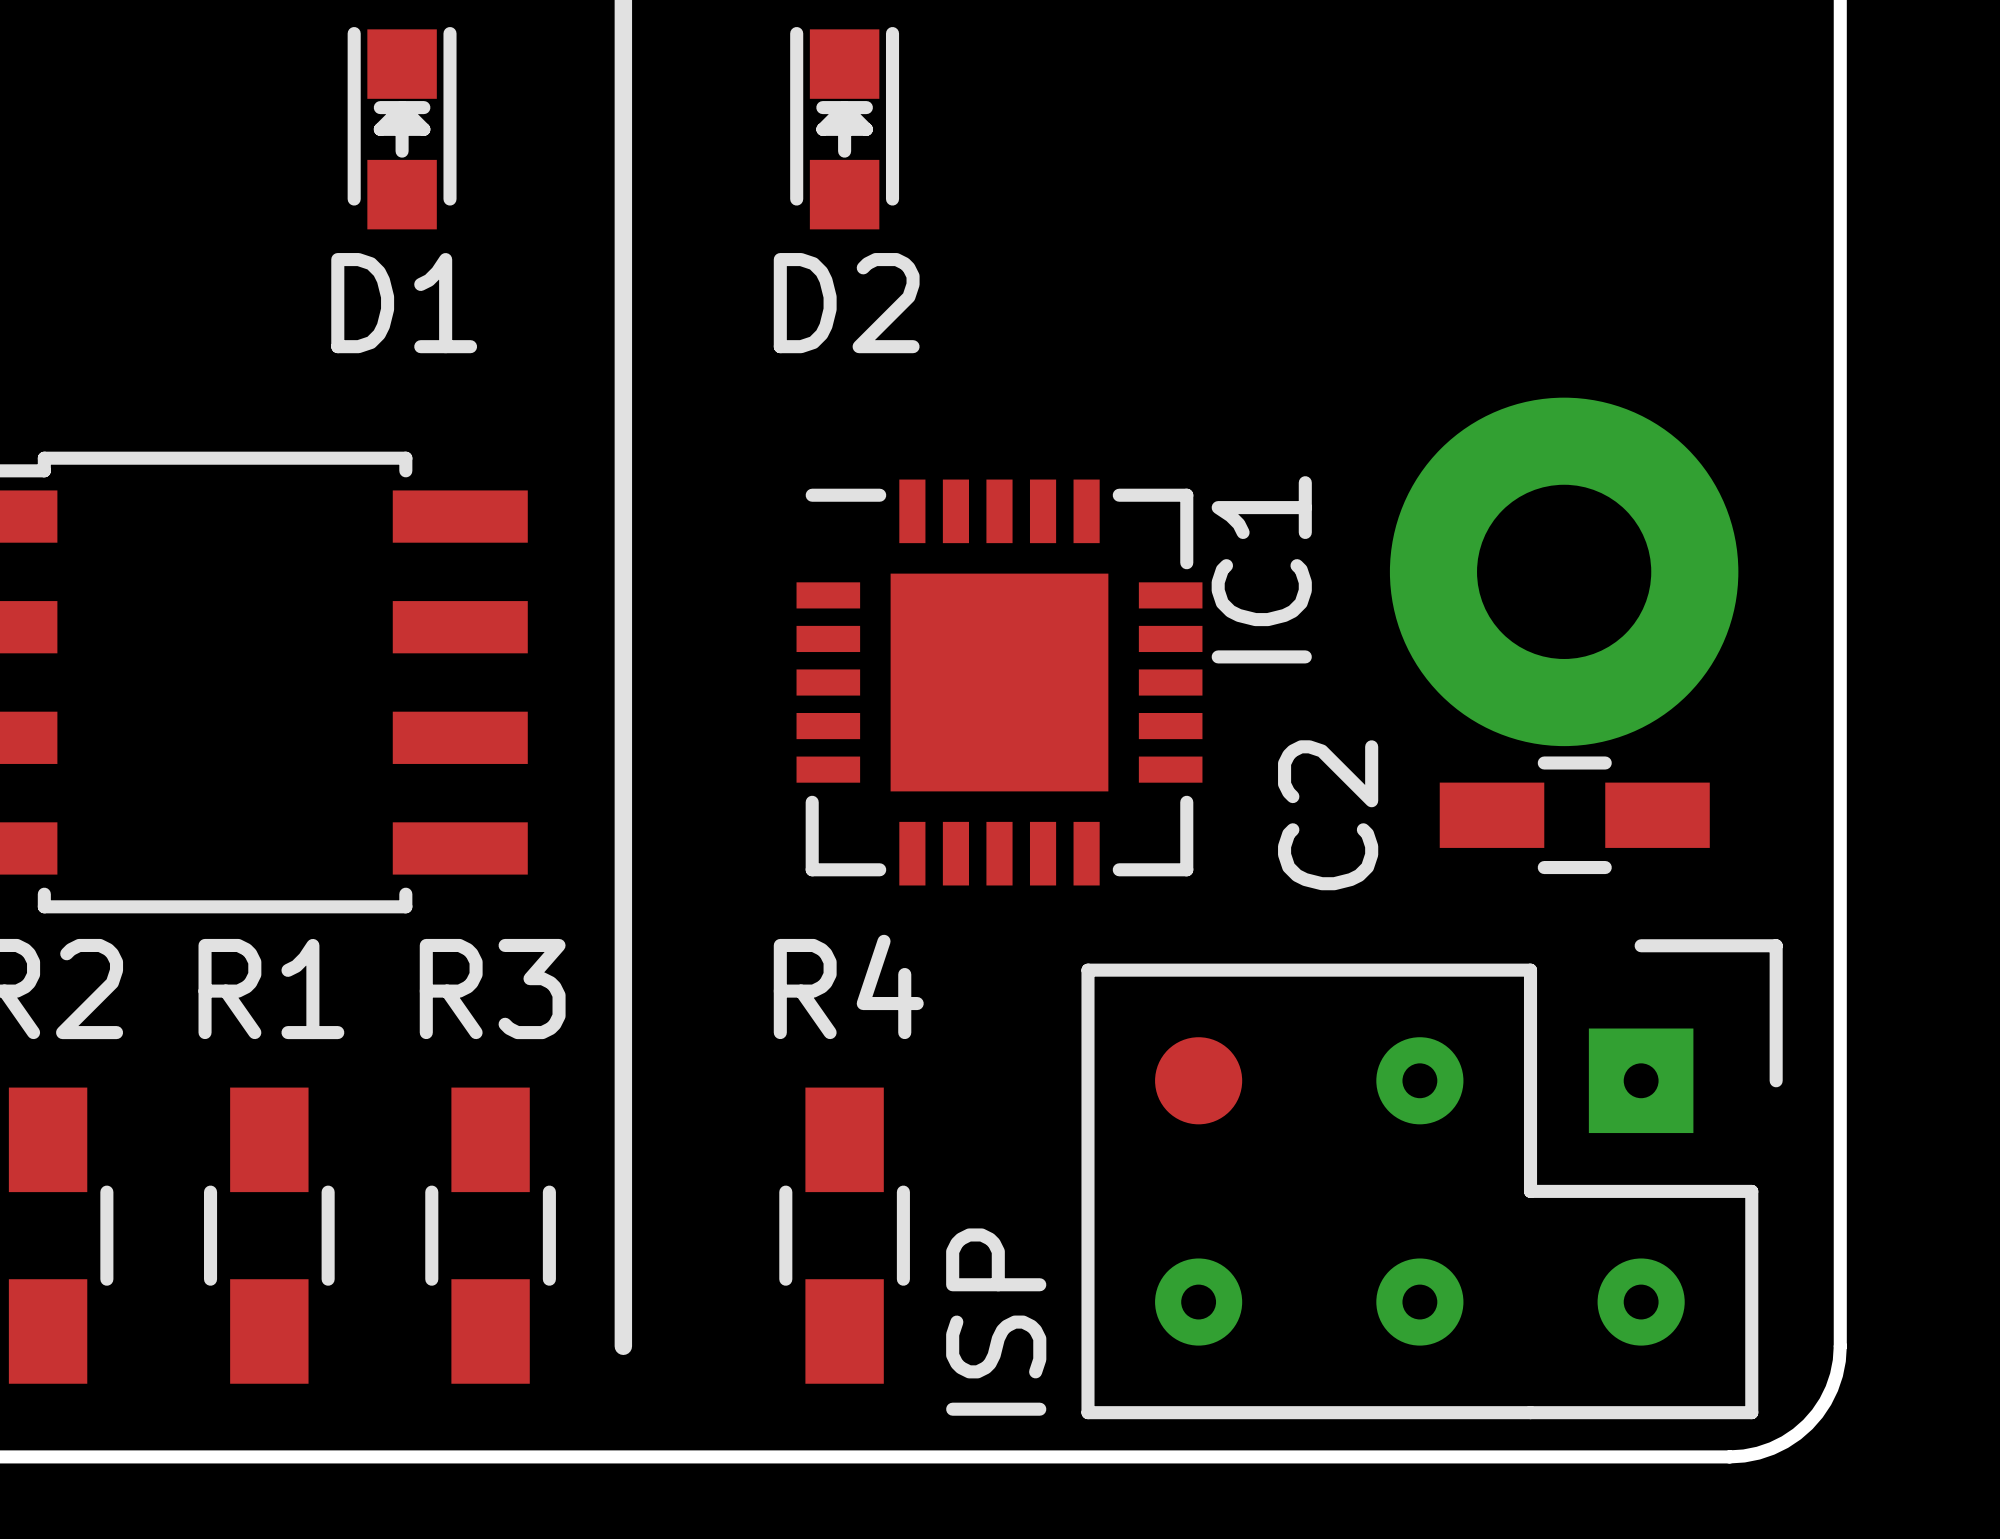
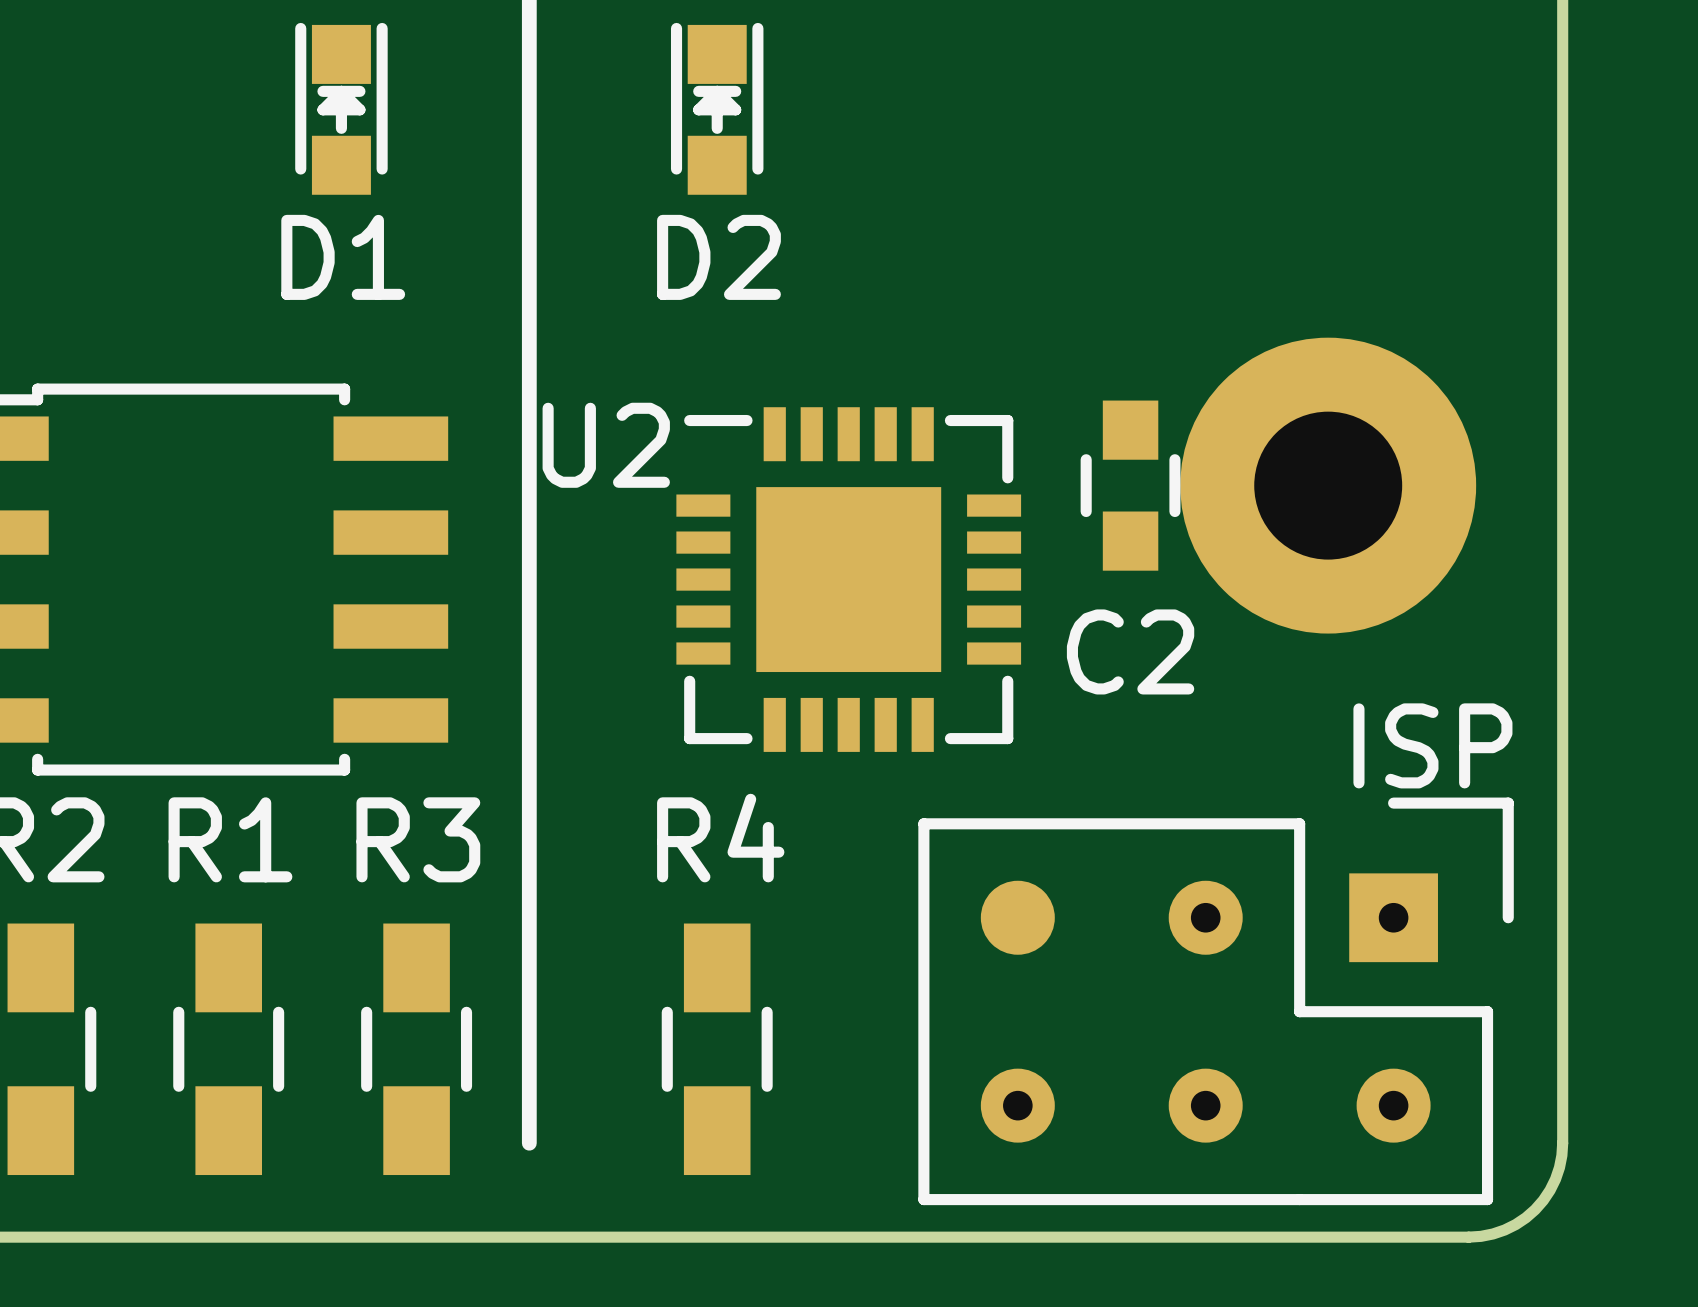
IC1 name: IC1 (1261, 569) -> U2 (606, 445)
C2 footprint: [1439, 756, 1710, 875] -> [1080, 400, 1181, 571]
C2 name position: C2 (1328, 815) -> C2 (1130, 651)
part value rotation: 0° (996, 1322) -> 90° clockwise (1432, 745)
part value position: ISP (996, 1322) -> ISP (1432, 745)

